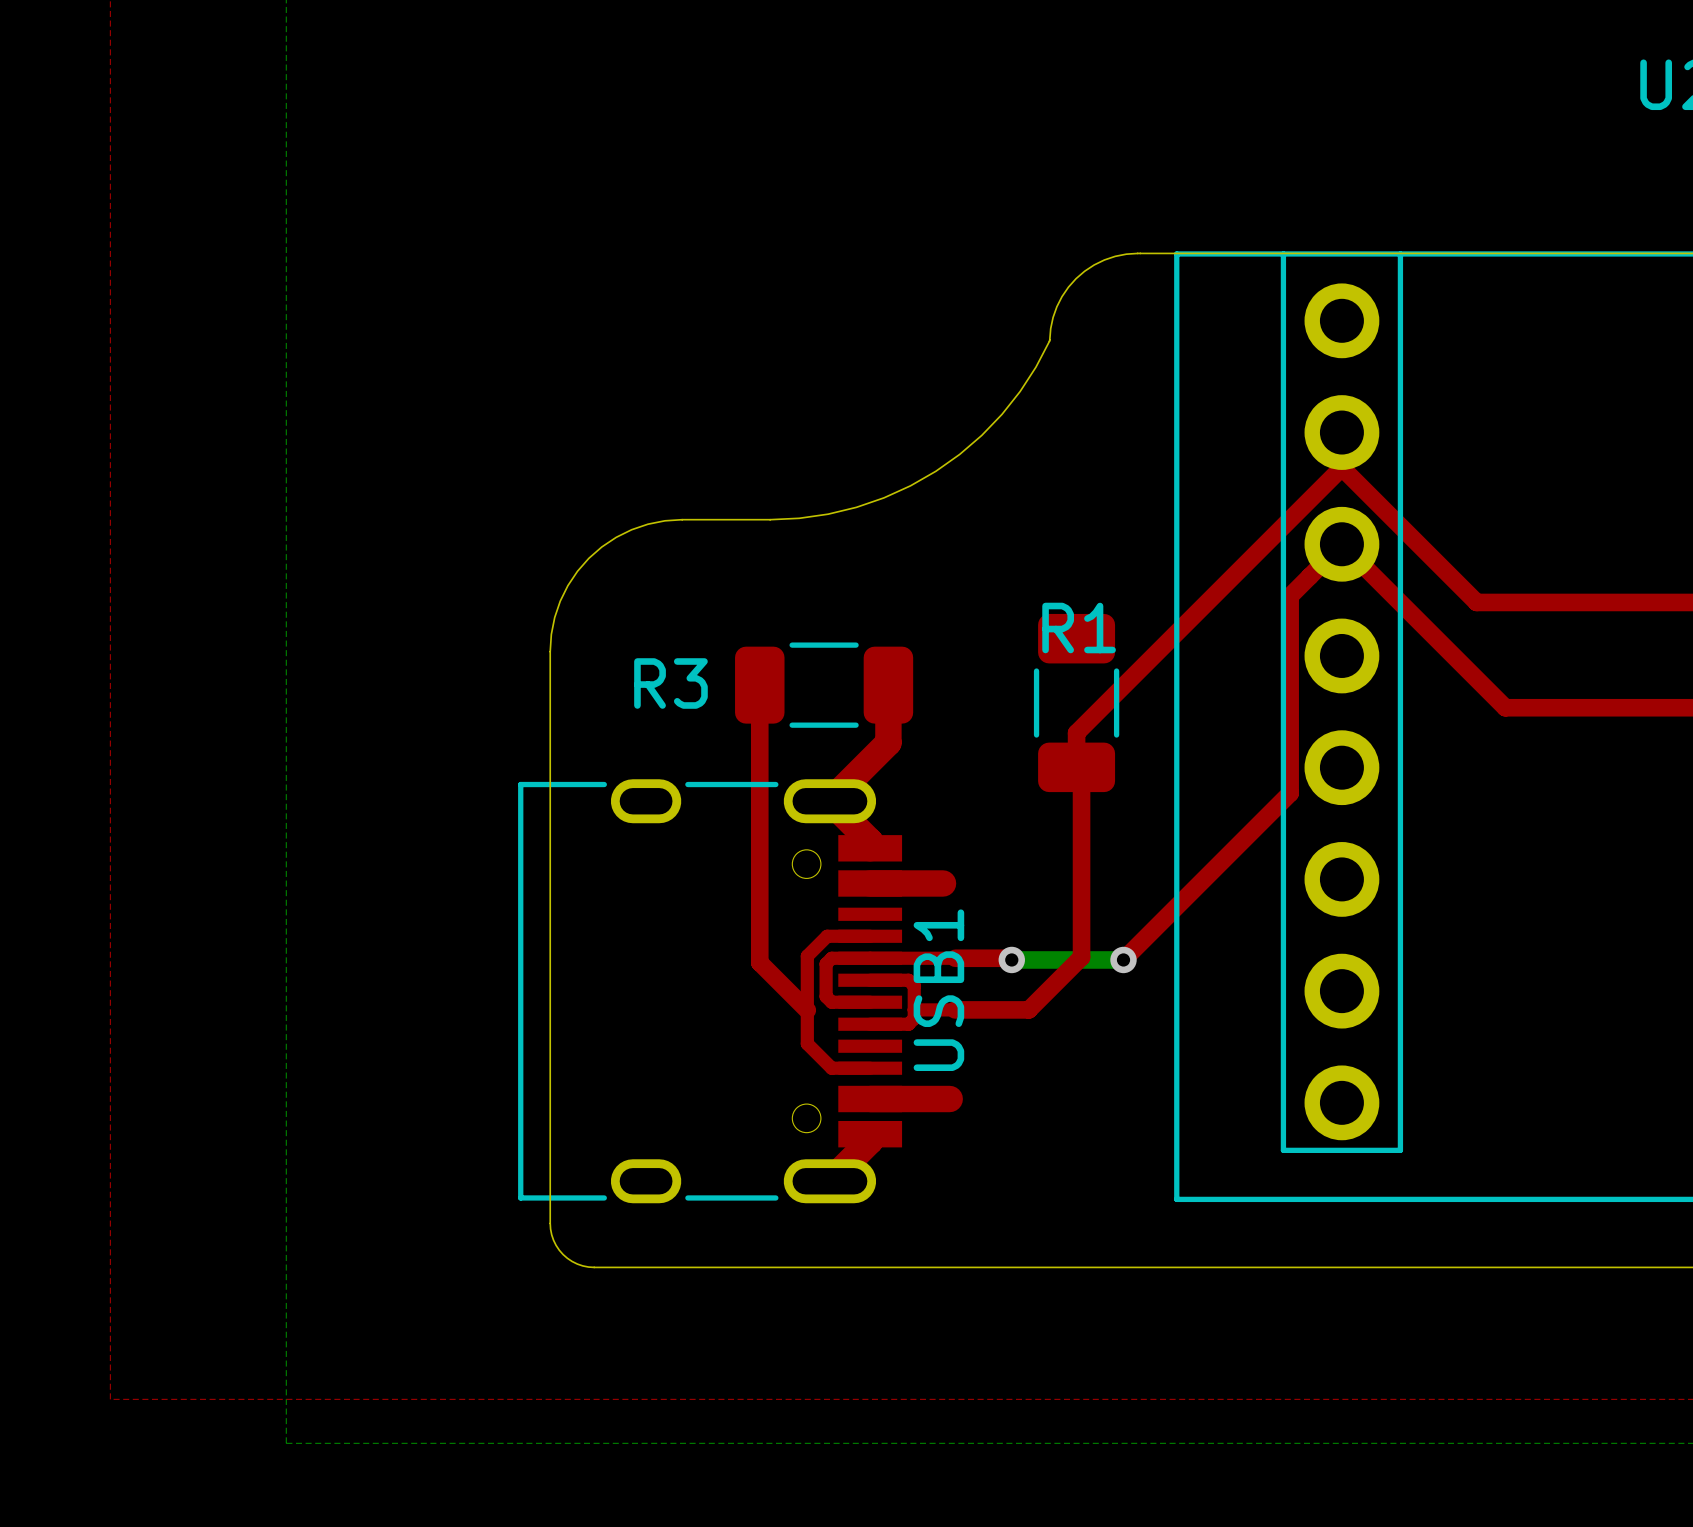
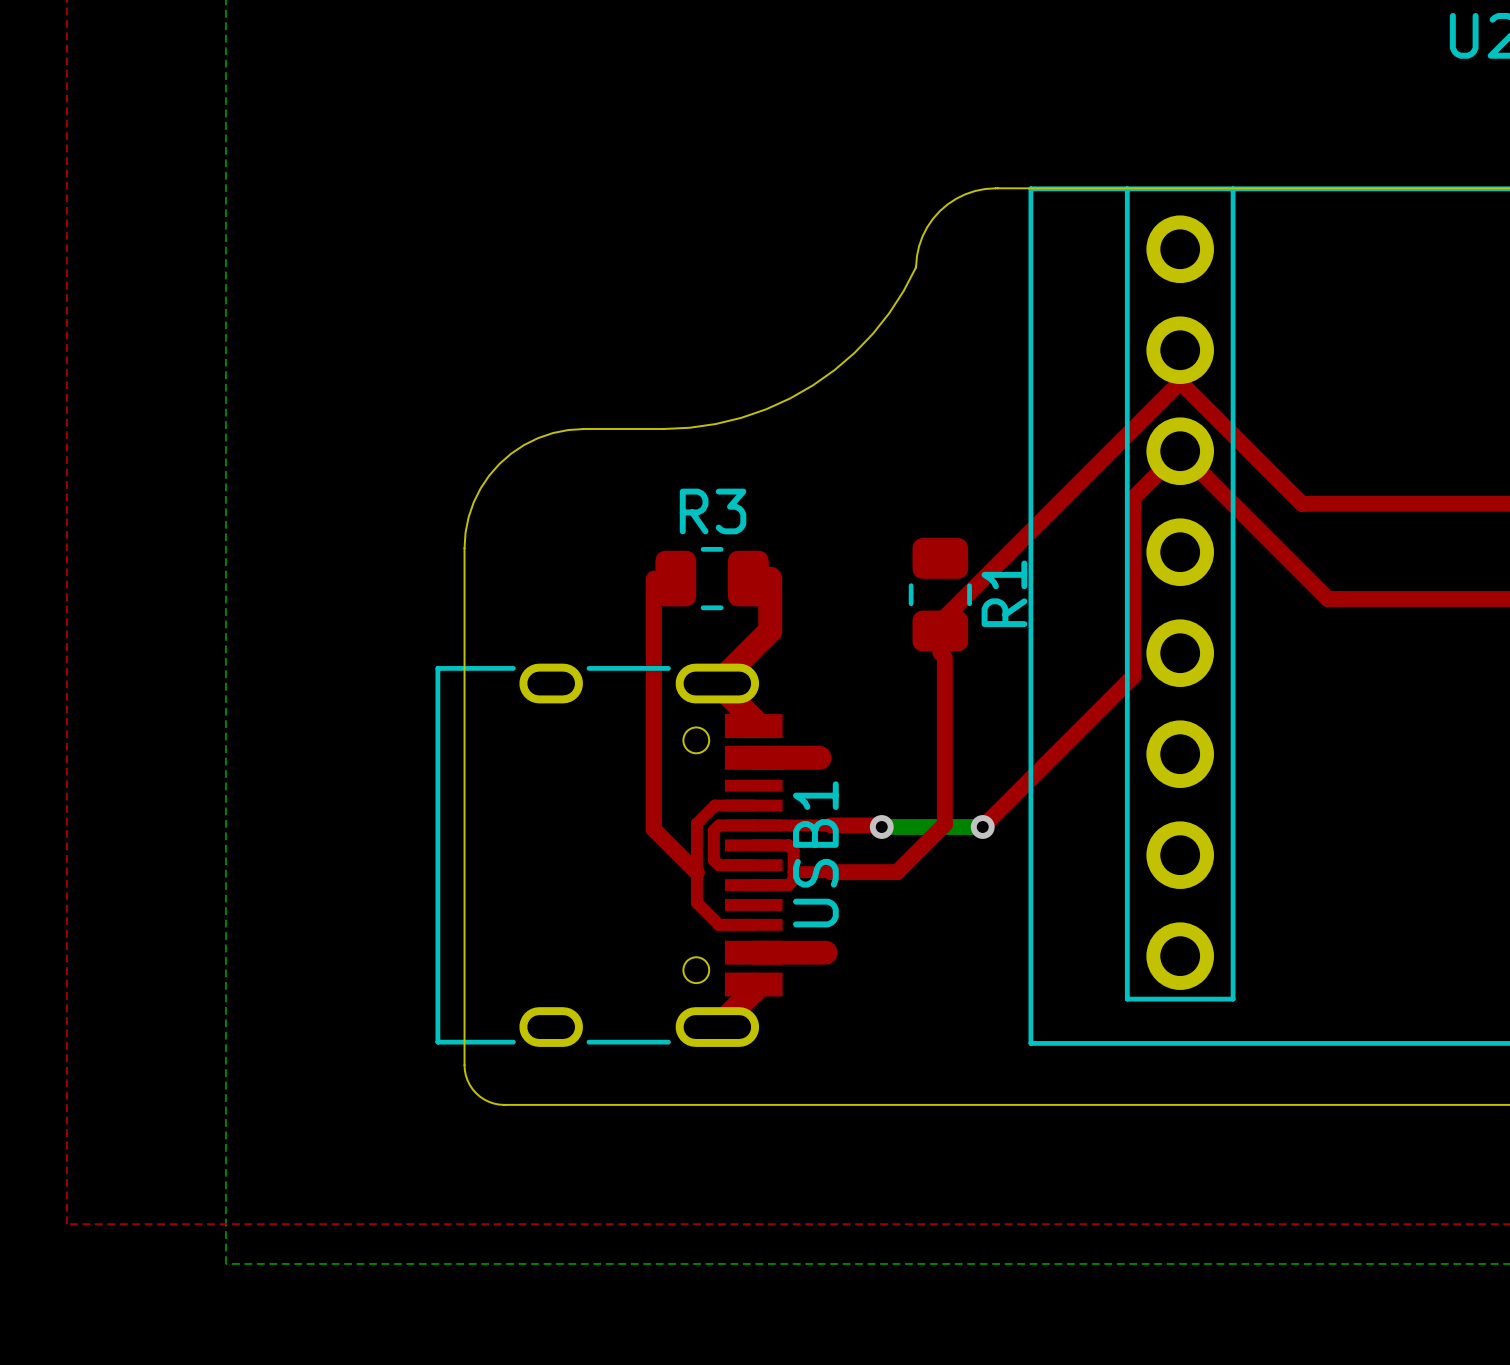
R1 footprint: [1033, 613, 1120, 793] -> [908, 538, 972, 652]
R1 name rotation: 0° (1079, 628) -> 90° counterclockwise (1004, 593)
R3 footprint: [735, 642, 914, 728] -> [655, 546, 769, 611]
R3 name position: R3 (670, 683) -> R3 (713, 511)

